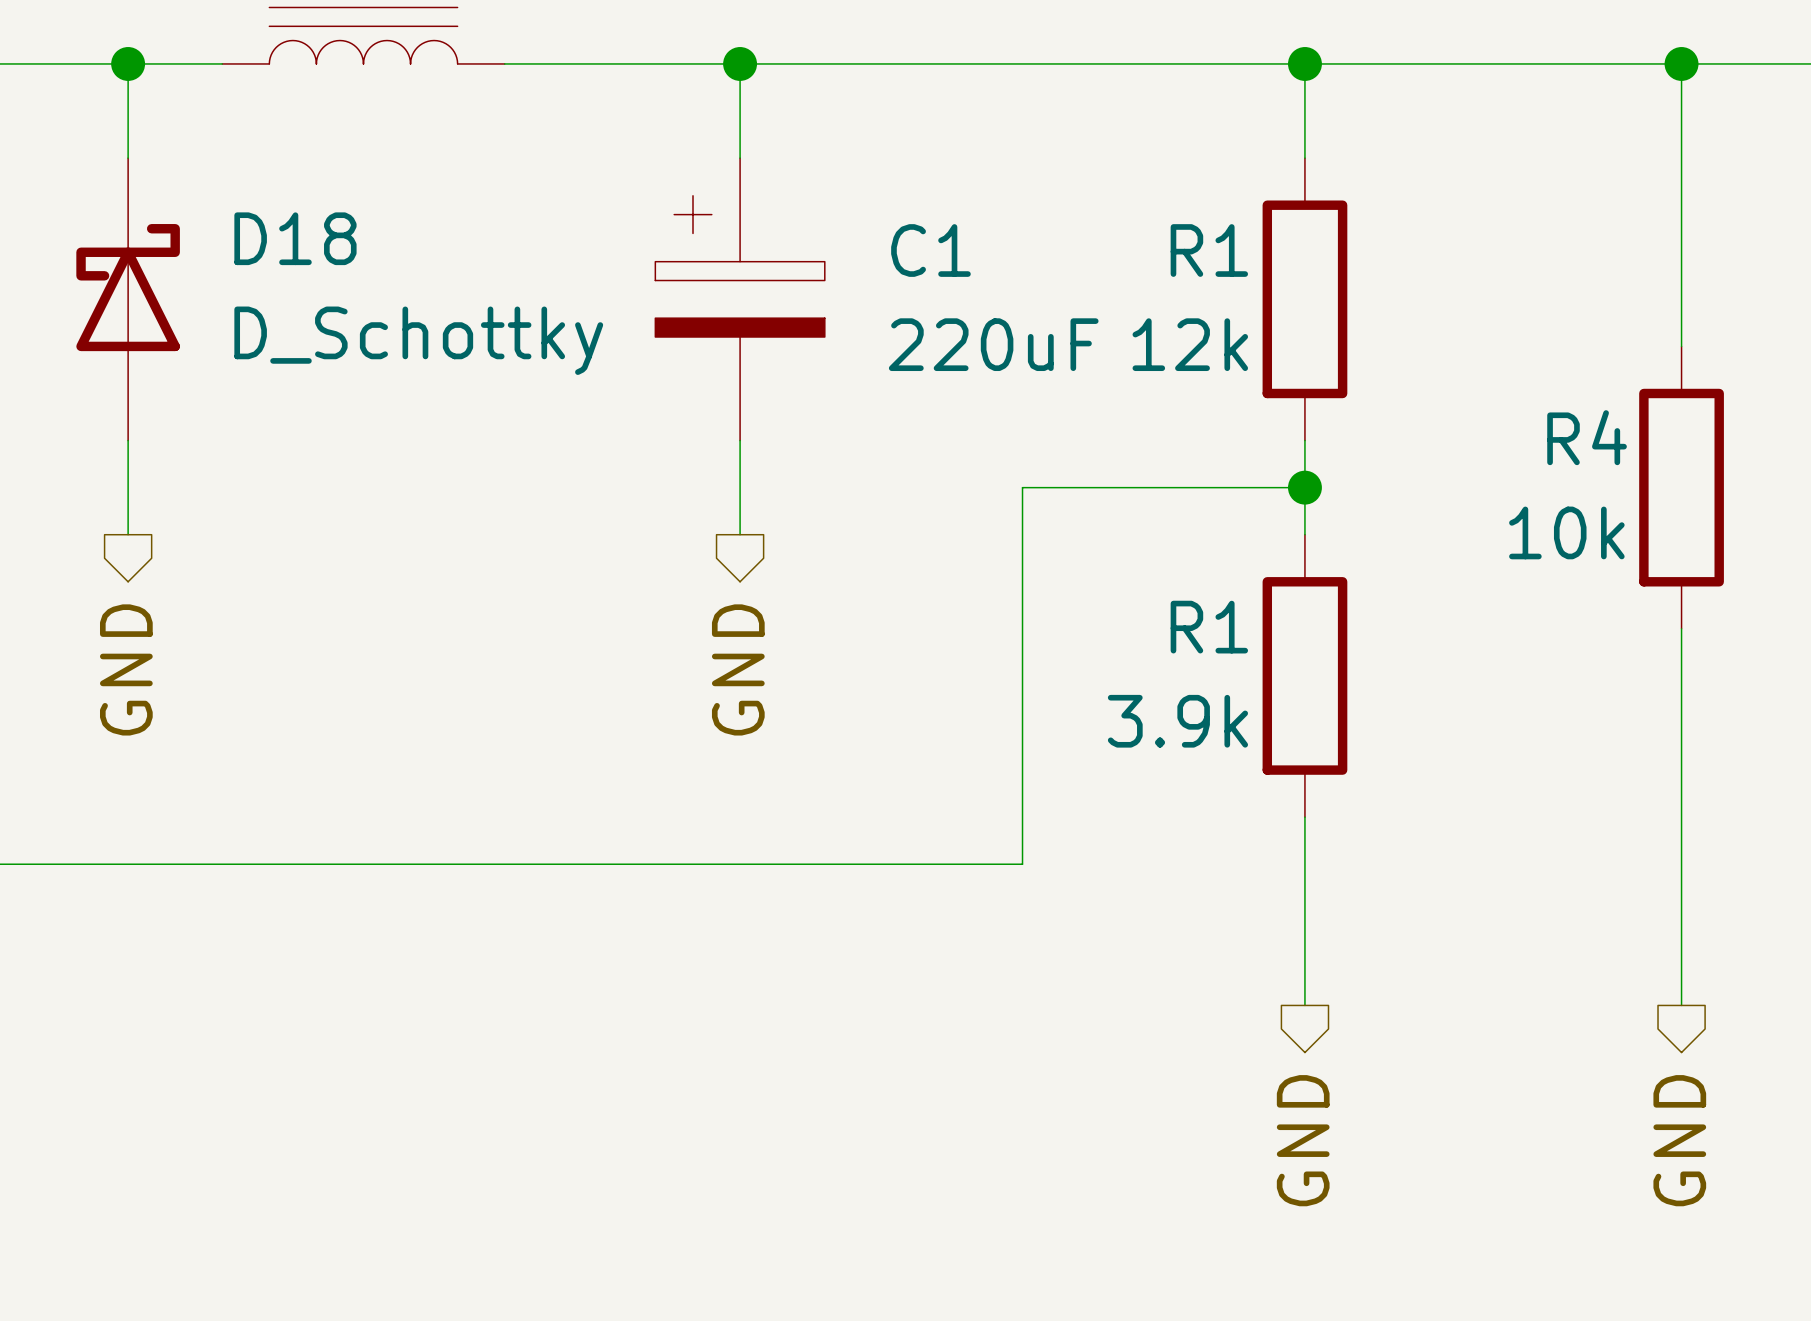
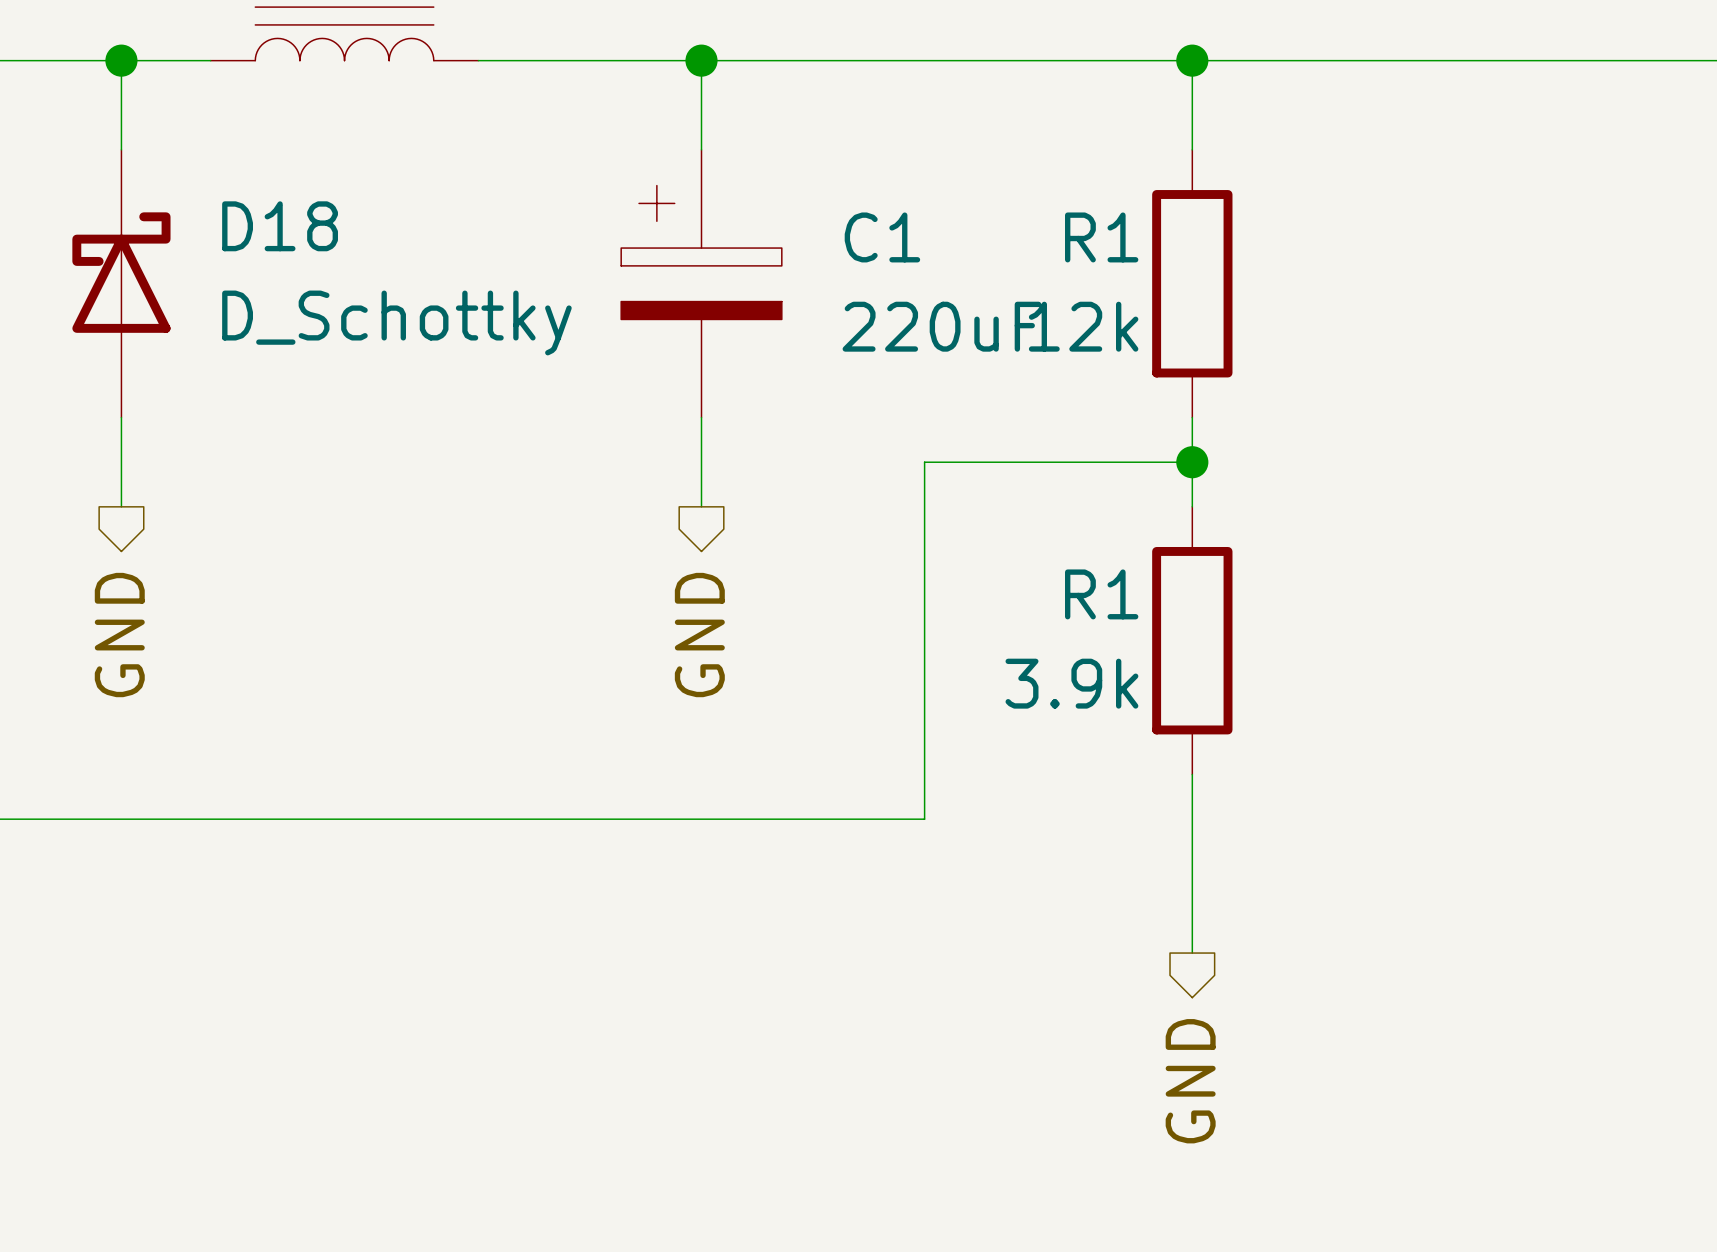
wire: (1304, 63) (1304, 158) -> (1192, 60) (1192, 149)
junction position: (1304, 63) -> (1192, 60)
wire: (1681, 63) (1681, 346) -> none
junction: (1681, 63) -> none
R1 position: (1304, 299) -> (1192, 283)
wire: (1304, 440) (1304, 534) -> (1192, 417) (1192, 506)
wire: (1022, 487) (1022, 864) (975, 864) -> (969, 462) (924, 462) (924, 819)
wire: (1257, 487) (1304, 487) -> none
junction position: (1304, 487) -> (1192, 462)
R4: 10k (1681, 487) -> none
wire: (1681, 628) (1681, 1005) -> none
R1 position: (1304, 675) -> (1192, 640)
wire: (1304, 817) (1304, 1005) -> (1192, 774) (1192, 953)
hierarchical label position: GND (1303, 1140) -> GND (1190, 1081)
hierarchical label: GND (1679, 1140) -> none

